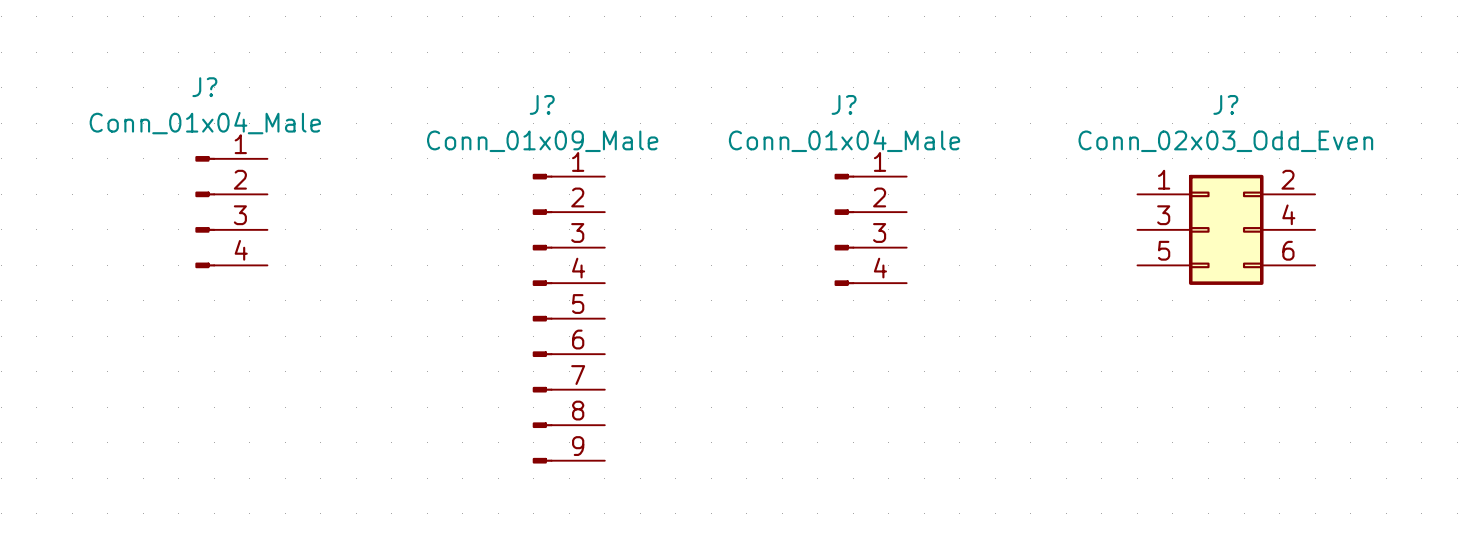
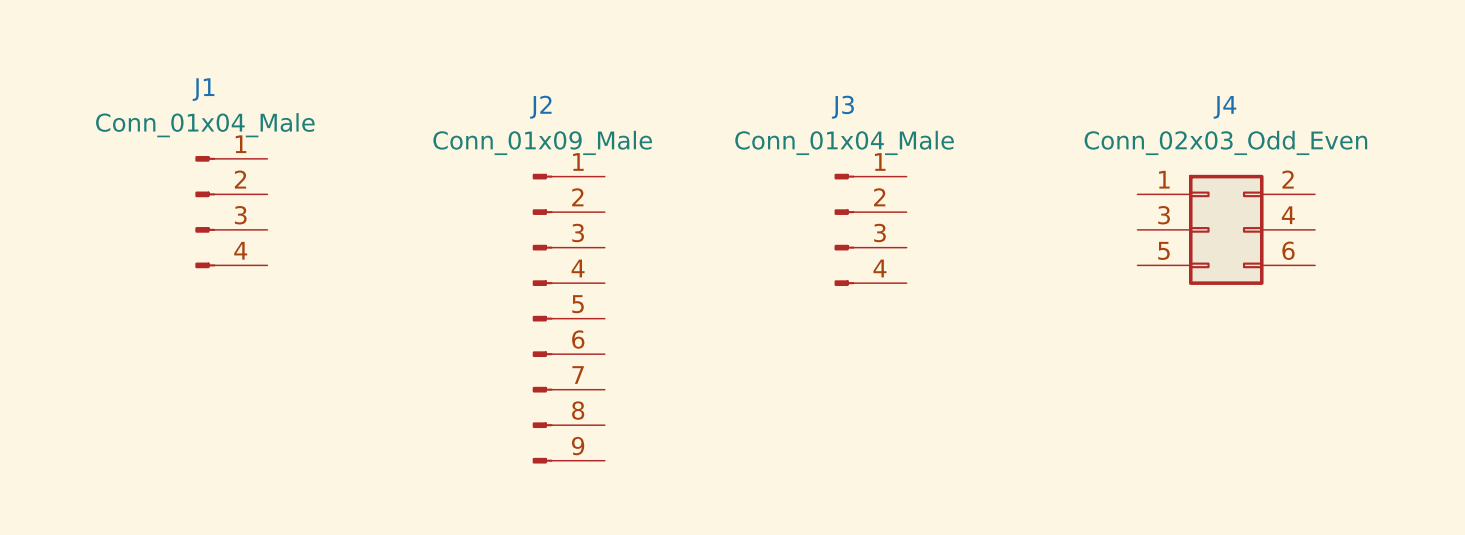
J? name: J? (204, 87) -> J1 (203, 89)
J? name: J? (542, 104) -> J2 (540, 107)
J? name: J? (844, 104) -> J3 (842, 107)
J? name: J? (1225, 104) -> J4 (1224, 107)

